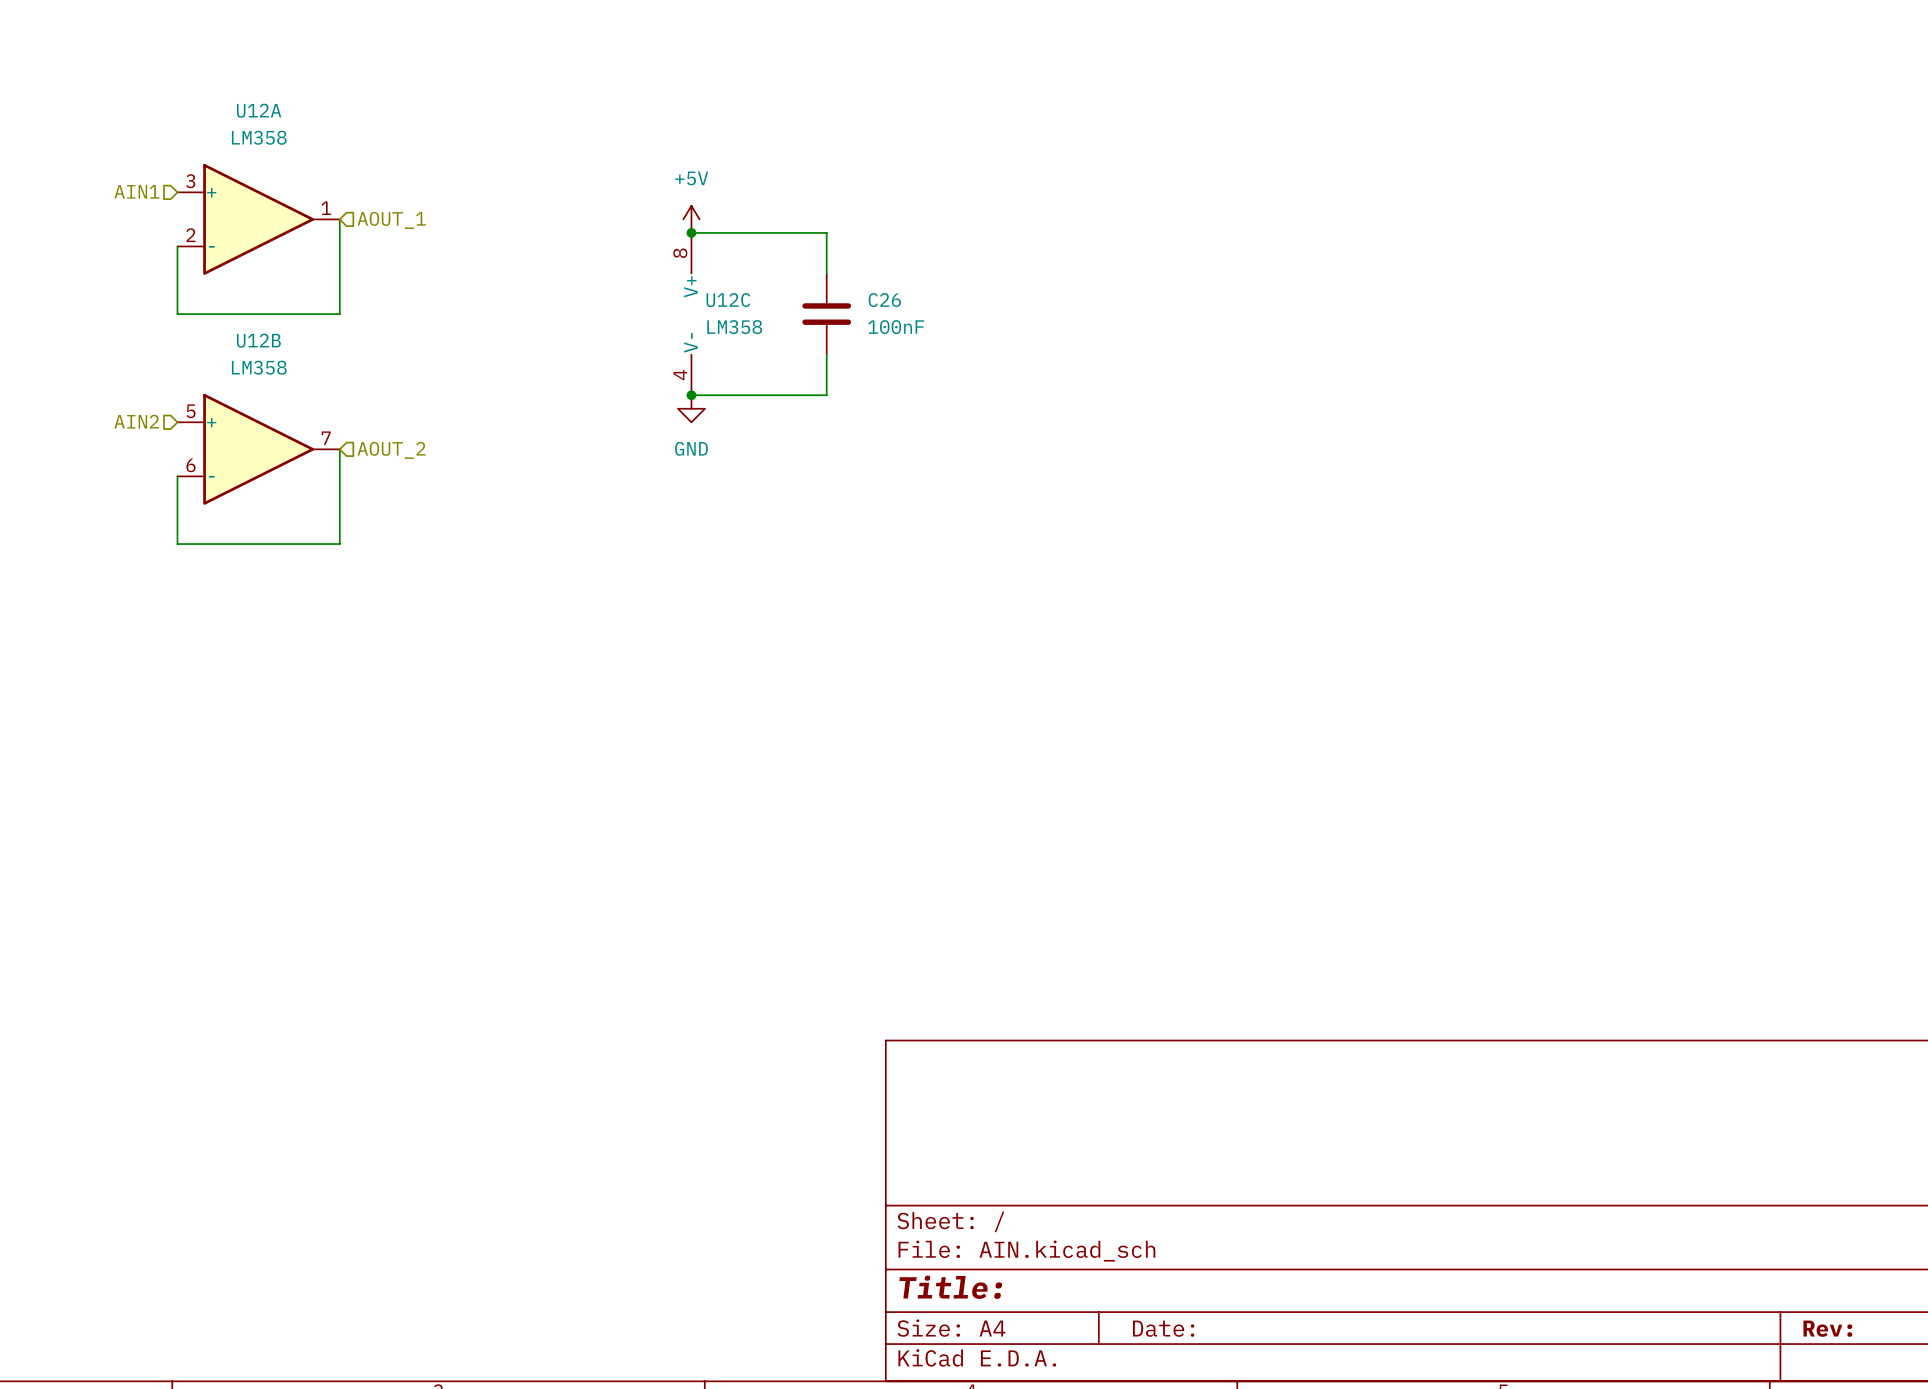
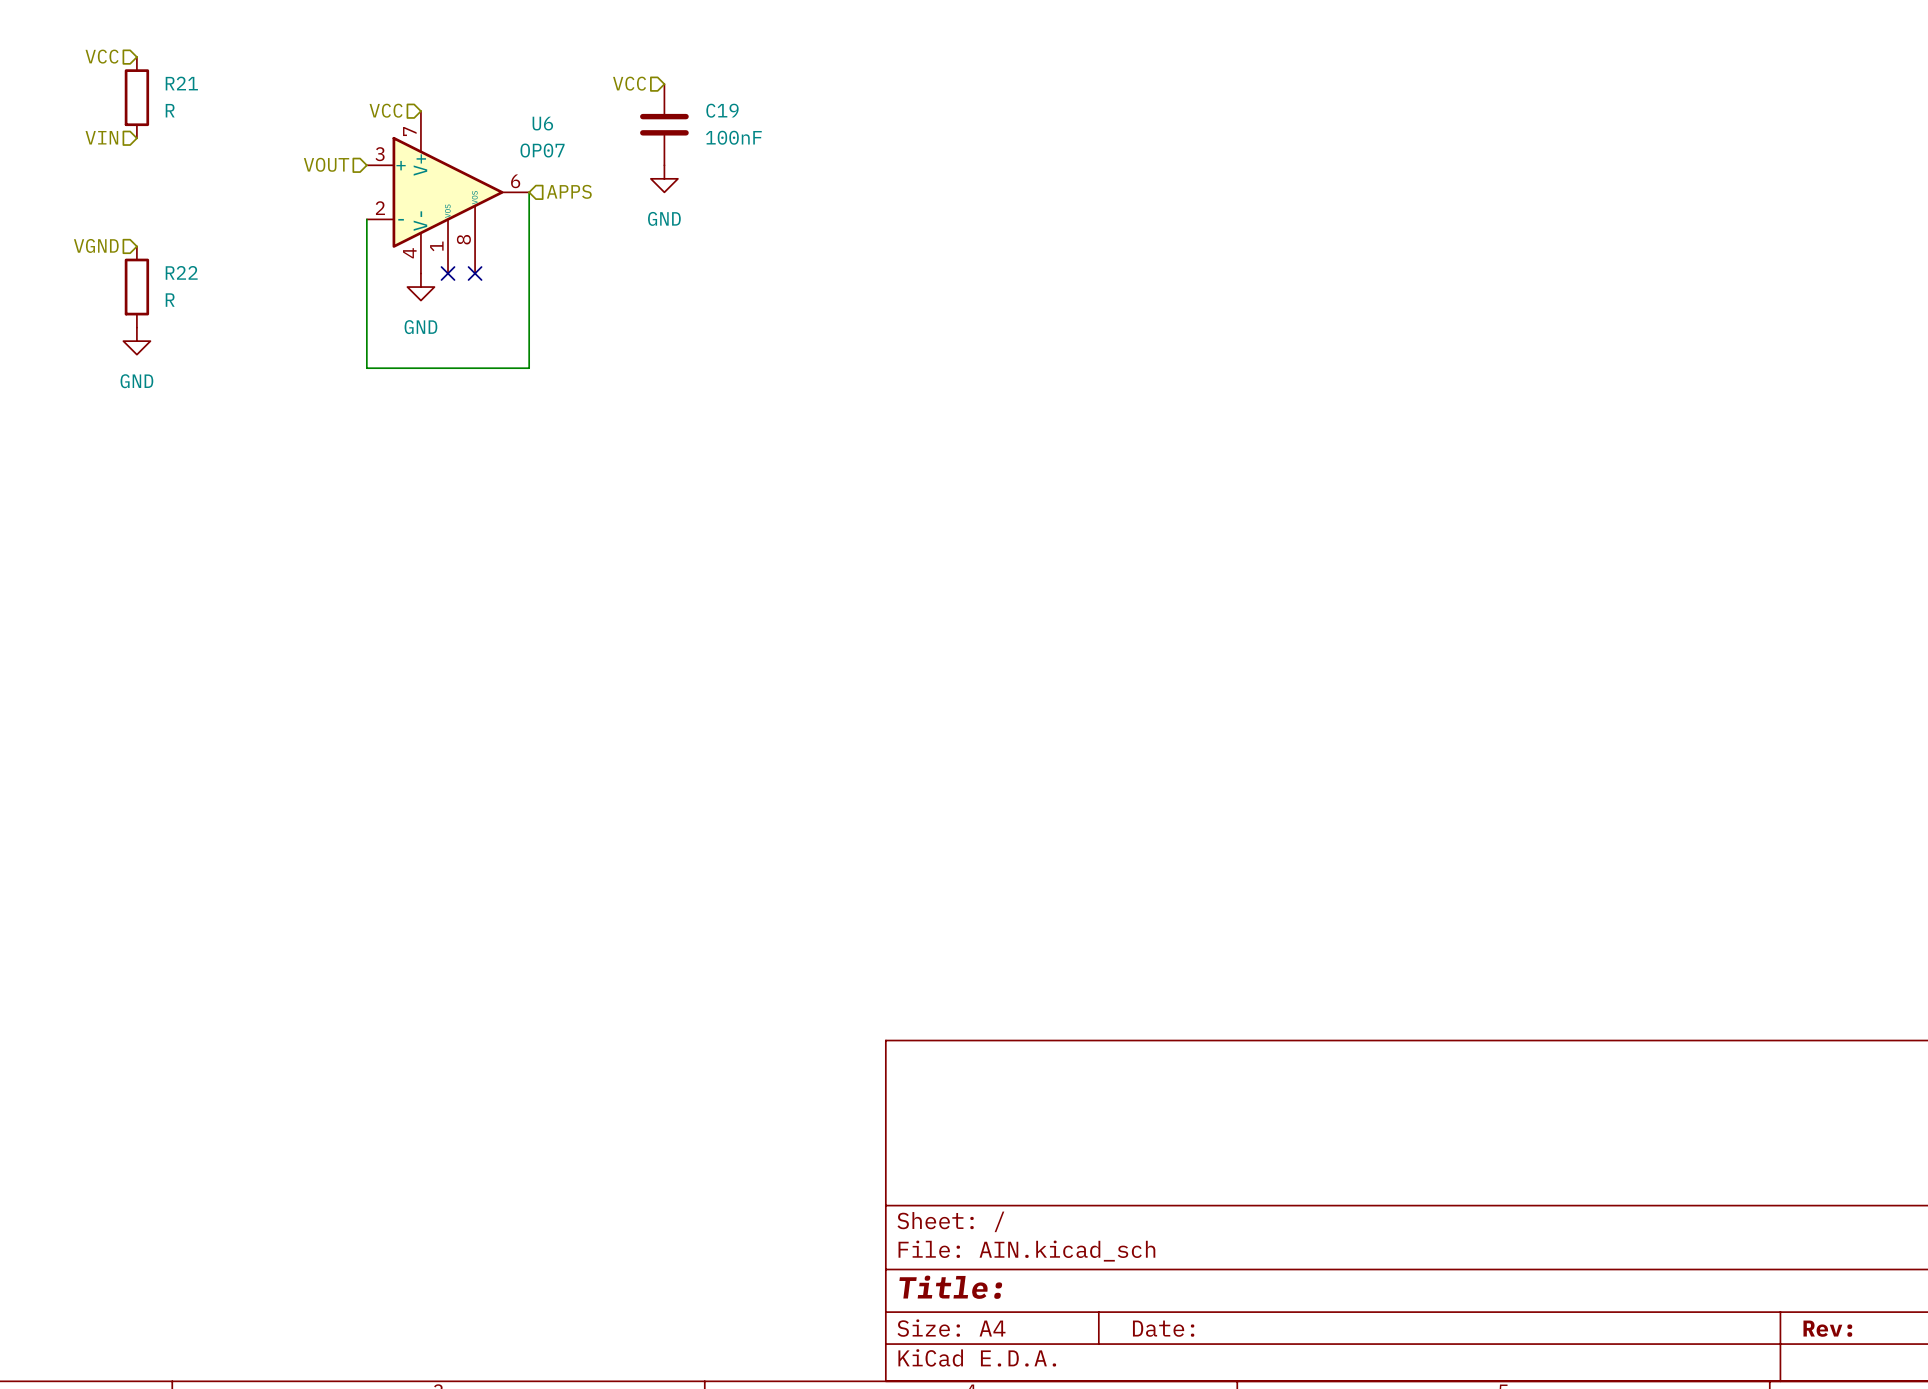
hierarchical label: none -> VCC (102, 56)
hierarchical label: none -> VCC (629, 83)
R21: none -> R (136, 97)
hierarchical label: none -> VCC (386, 110)
C19: none -> 100nF (664, 124)
hierarchical label: none -> VIN (101, 137)
hierarchical label: none -> VOUT (326, 164)
power symbol: none -> GND (664, 178)
hierarchical label: AIN1 (136, 191) -> none
hierarchical label: none -> APPS (569, 191)
U6: none -> OP07 (448, 192)
wire: none -> (529, 192) (529, 368) (366, 368) (366, 219)
U12A: LM358 (258, 219) -> none
wire: (339, 219) (339, 314) (177, 314) (177, 246) -> none
power symbol: +5V (691, 219) -> none
hierarchical label: AOUT_1 (391, 220) -> none
wire: (691, 232) (826, 232) (826, 273) -> none
junction: (691, 232) -> none
hierarchical label: none -> VGND (96, 245)
no-connect mark: none -> (448, 273)
no-connect mark: none -> (475, 273)
R22: none -> R (136, 287)
power symbol: none -> GND (420, 287)
U12C: LM358 (691, 314) -> none
C26: 100nF (826, 314) -> none
power symbol: none -> GND (136, 341)
wire: (826, 354) (826, 395) (691, 395) -> none
junction: (691, 395) -> none
power symbol: GND (691, 408) -> none
hierarchical label: AIN2 (136, 421) -> none
U12B: LM358 (258, 449) -> none
wire: (339, 449) (339, 544) (177, 544) (177, 476) -> none
hierarchical label: AOUT_2 (391, 450) -> none

